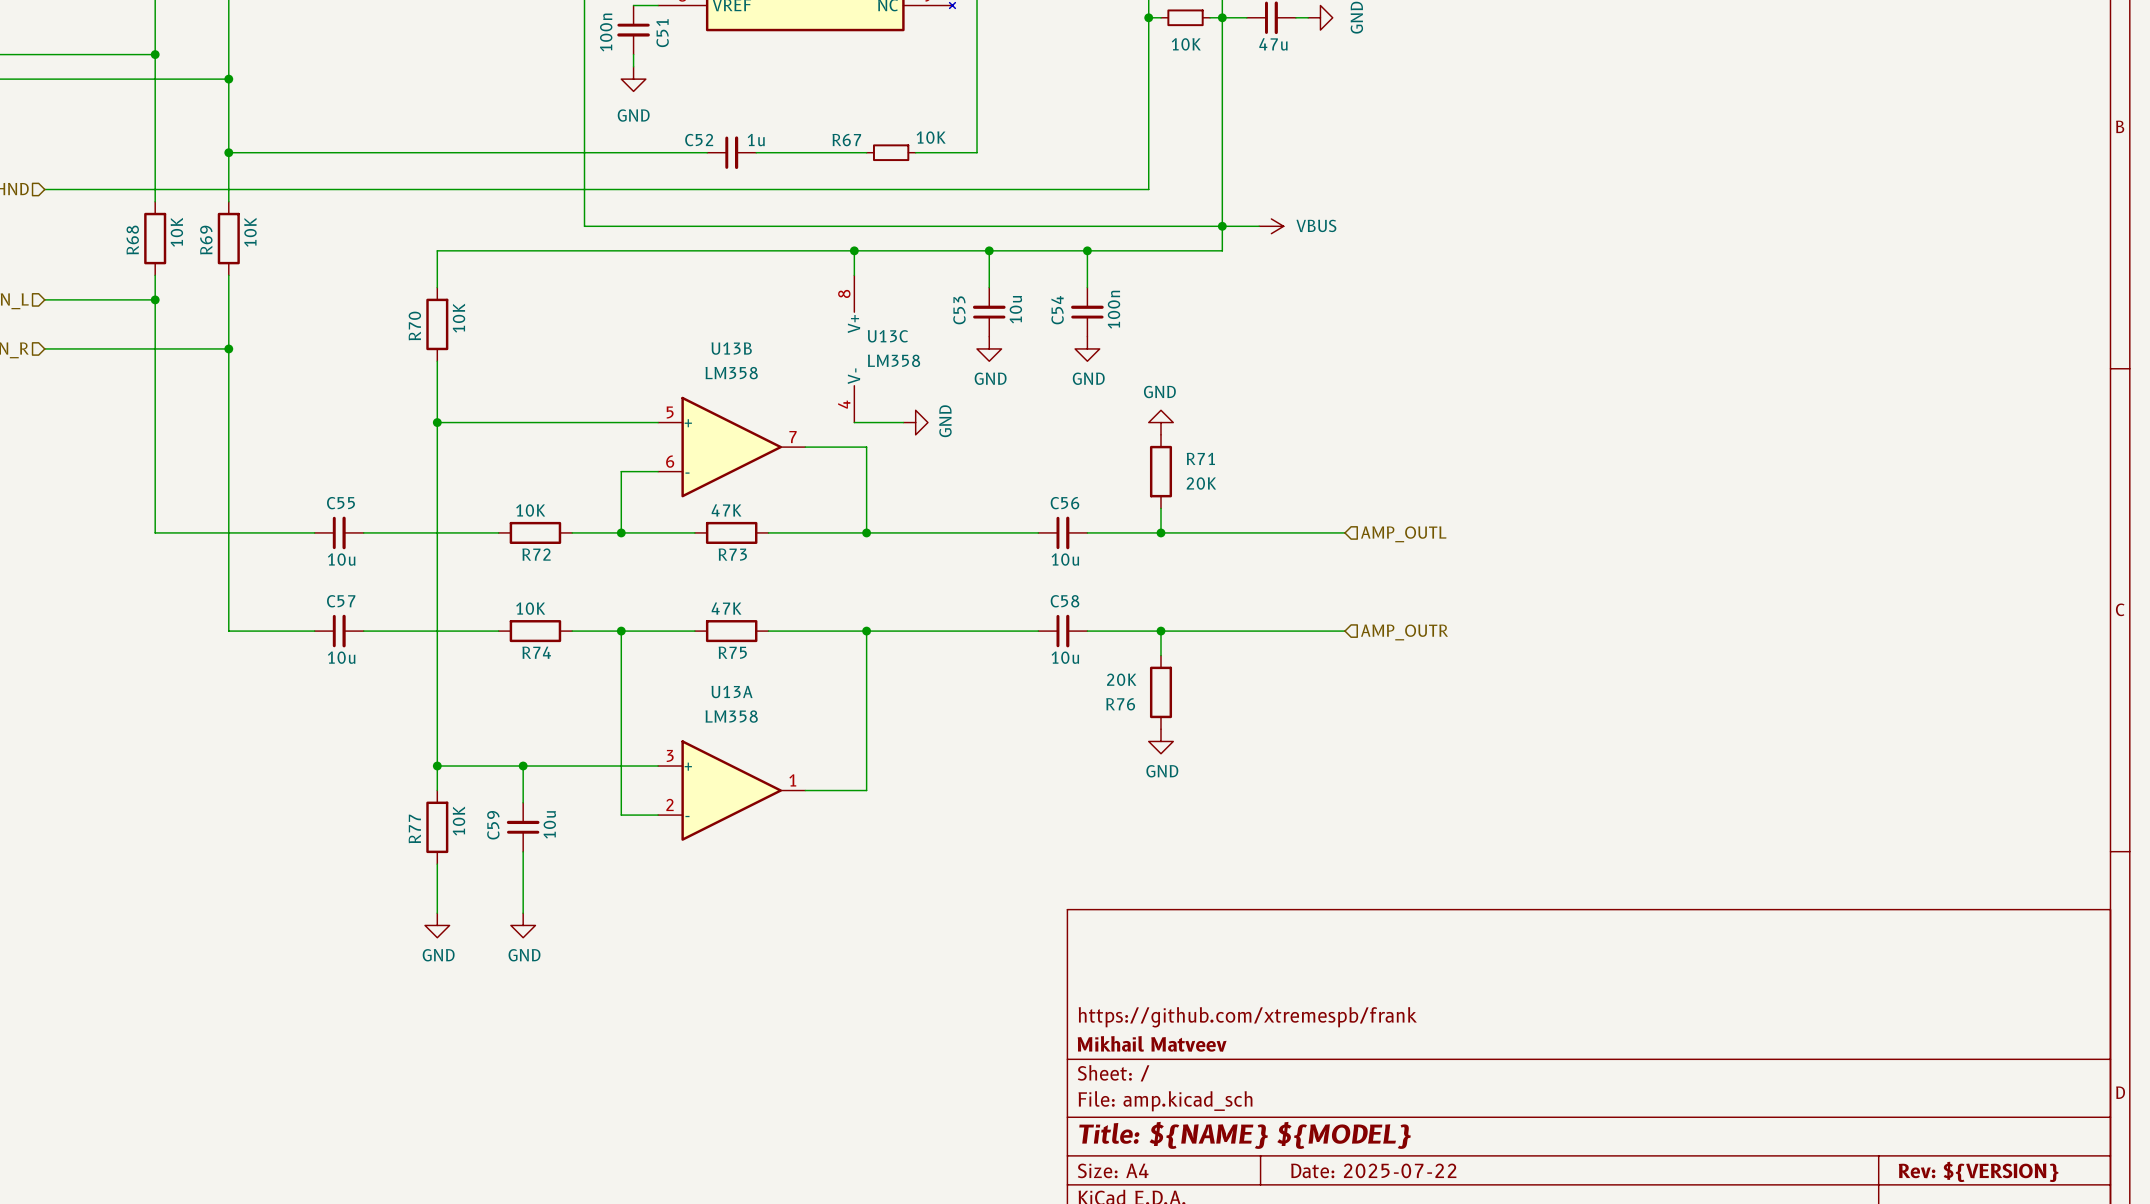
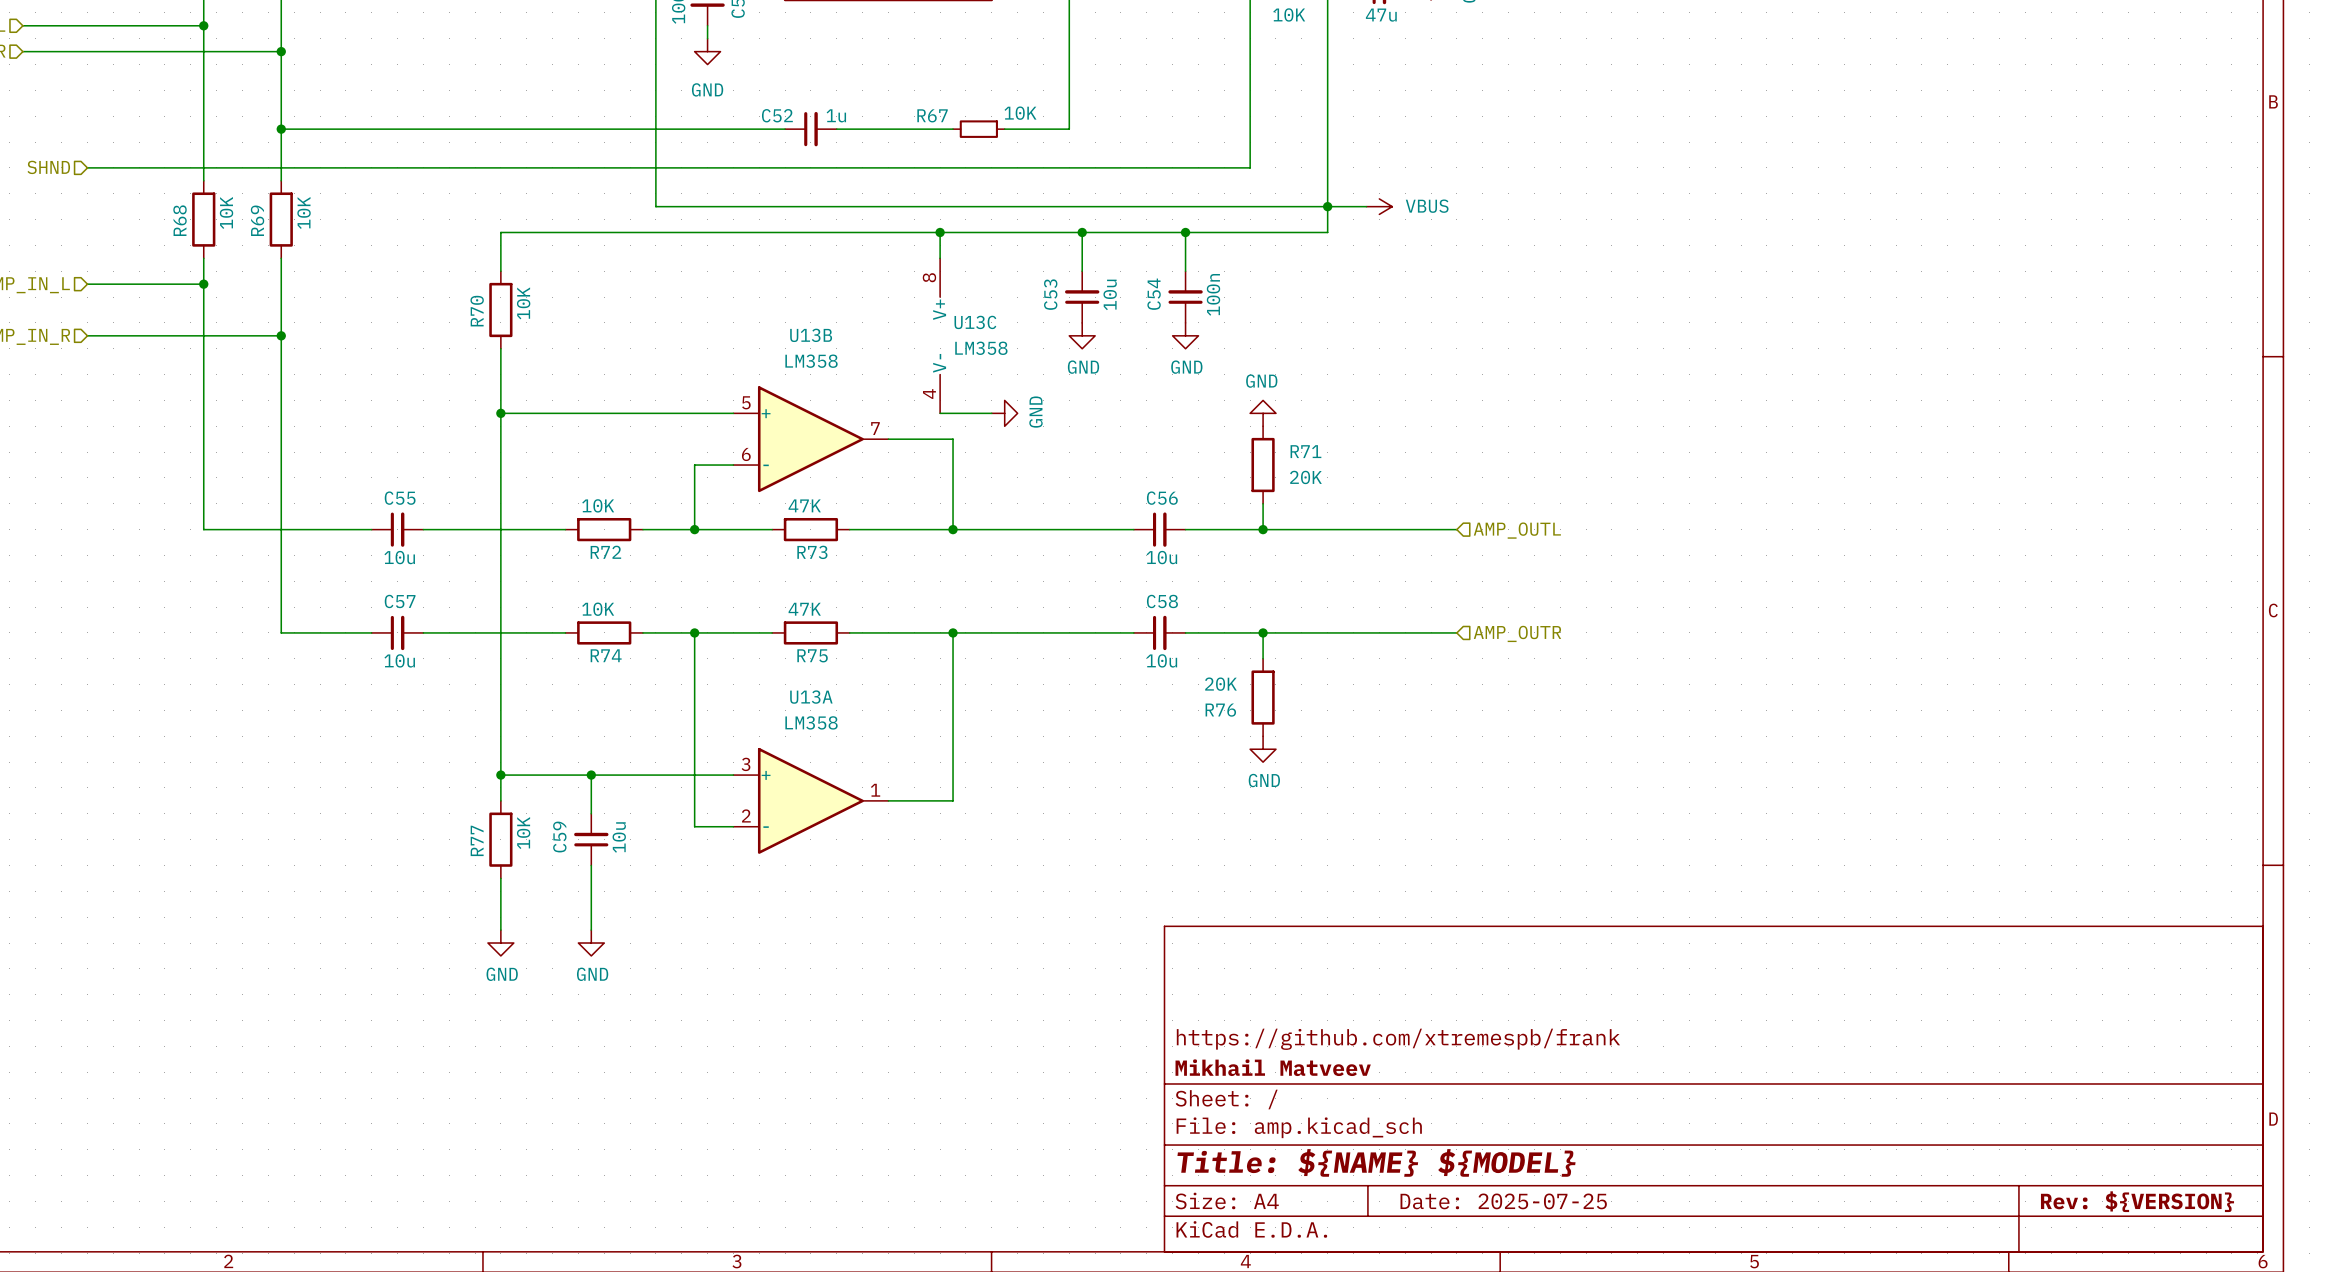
title block: Date: 2025-07-22 (1373, 1170) -> Date: 2025-07-25 (1503, 1201)

